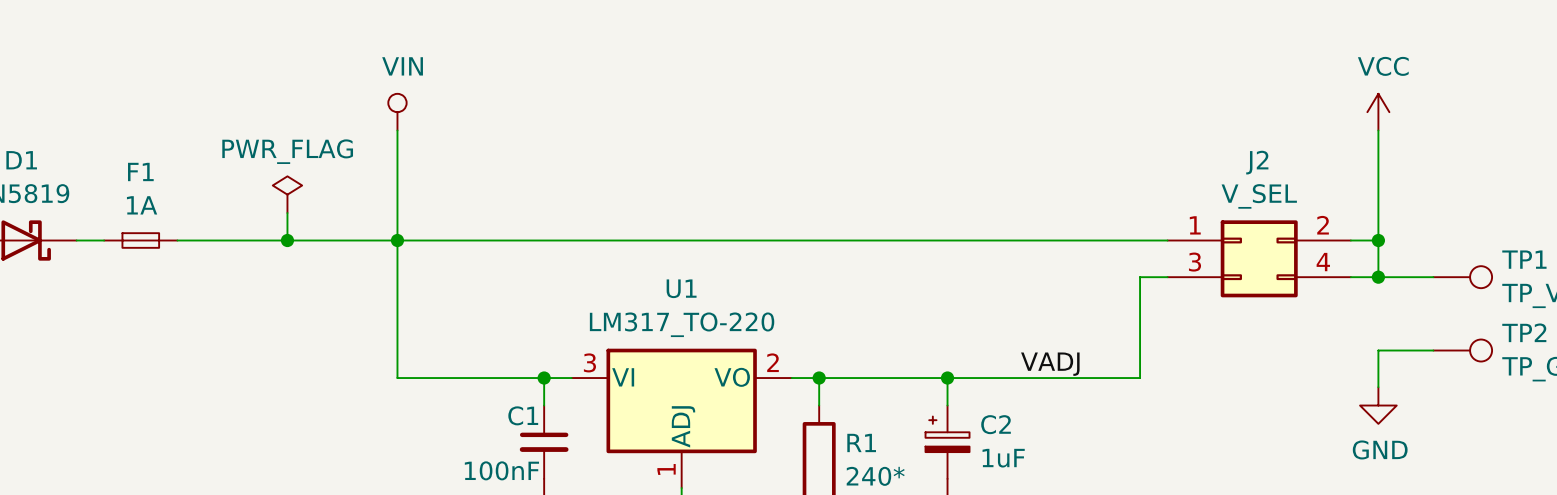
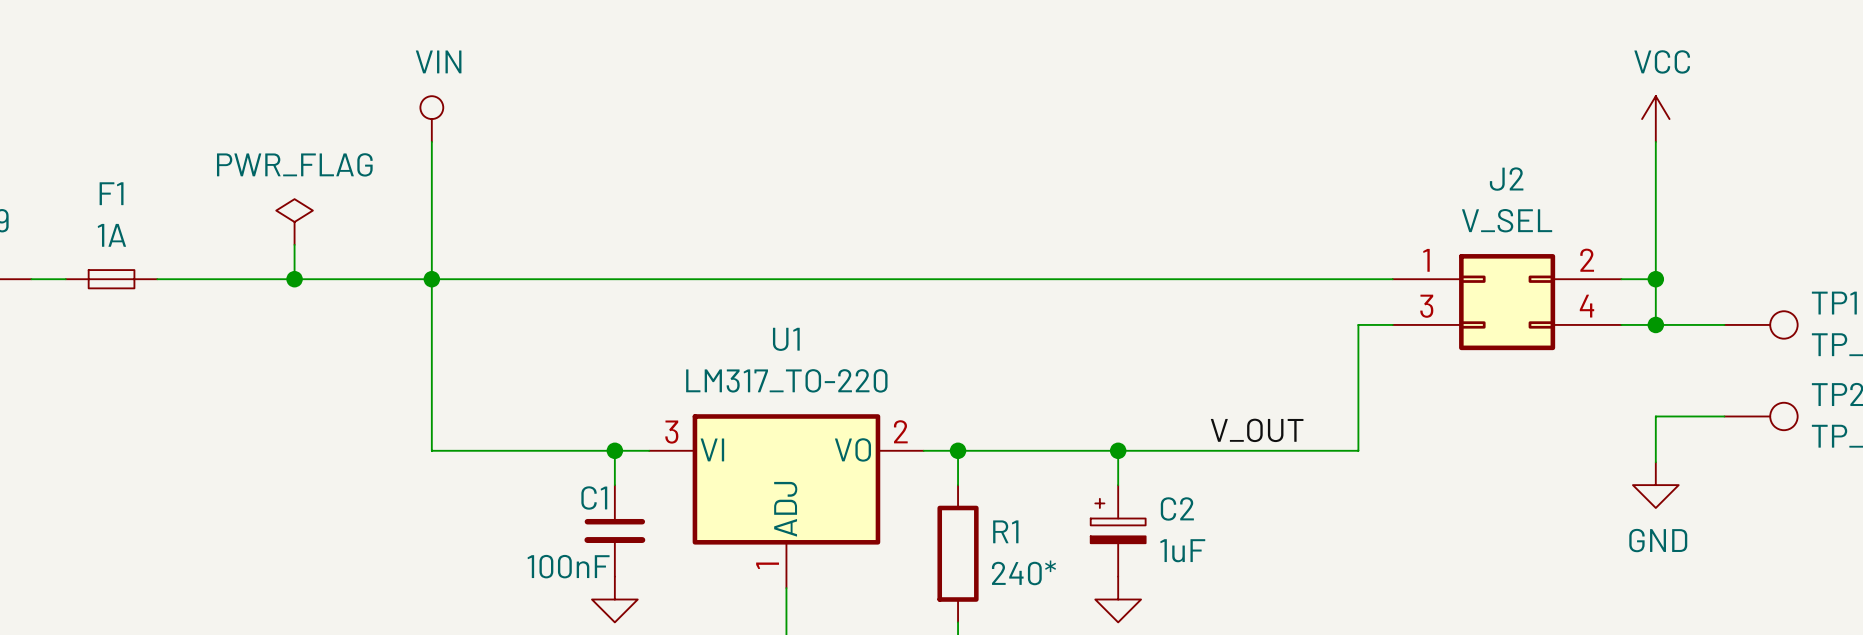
label: VADJ (1050, 364) -> V_OUT (1257, 430)

